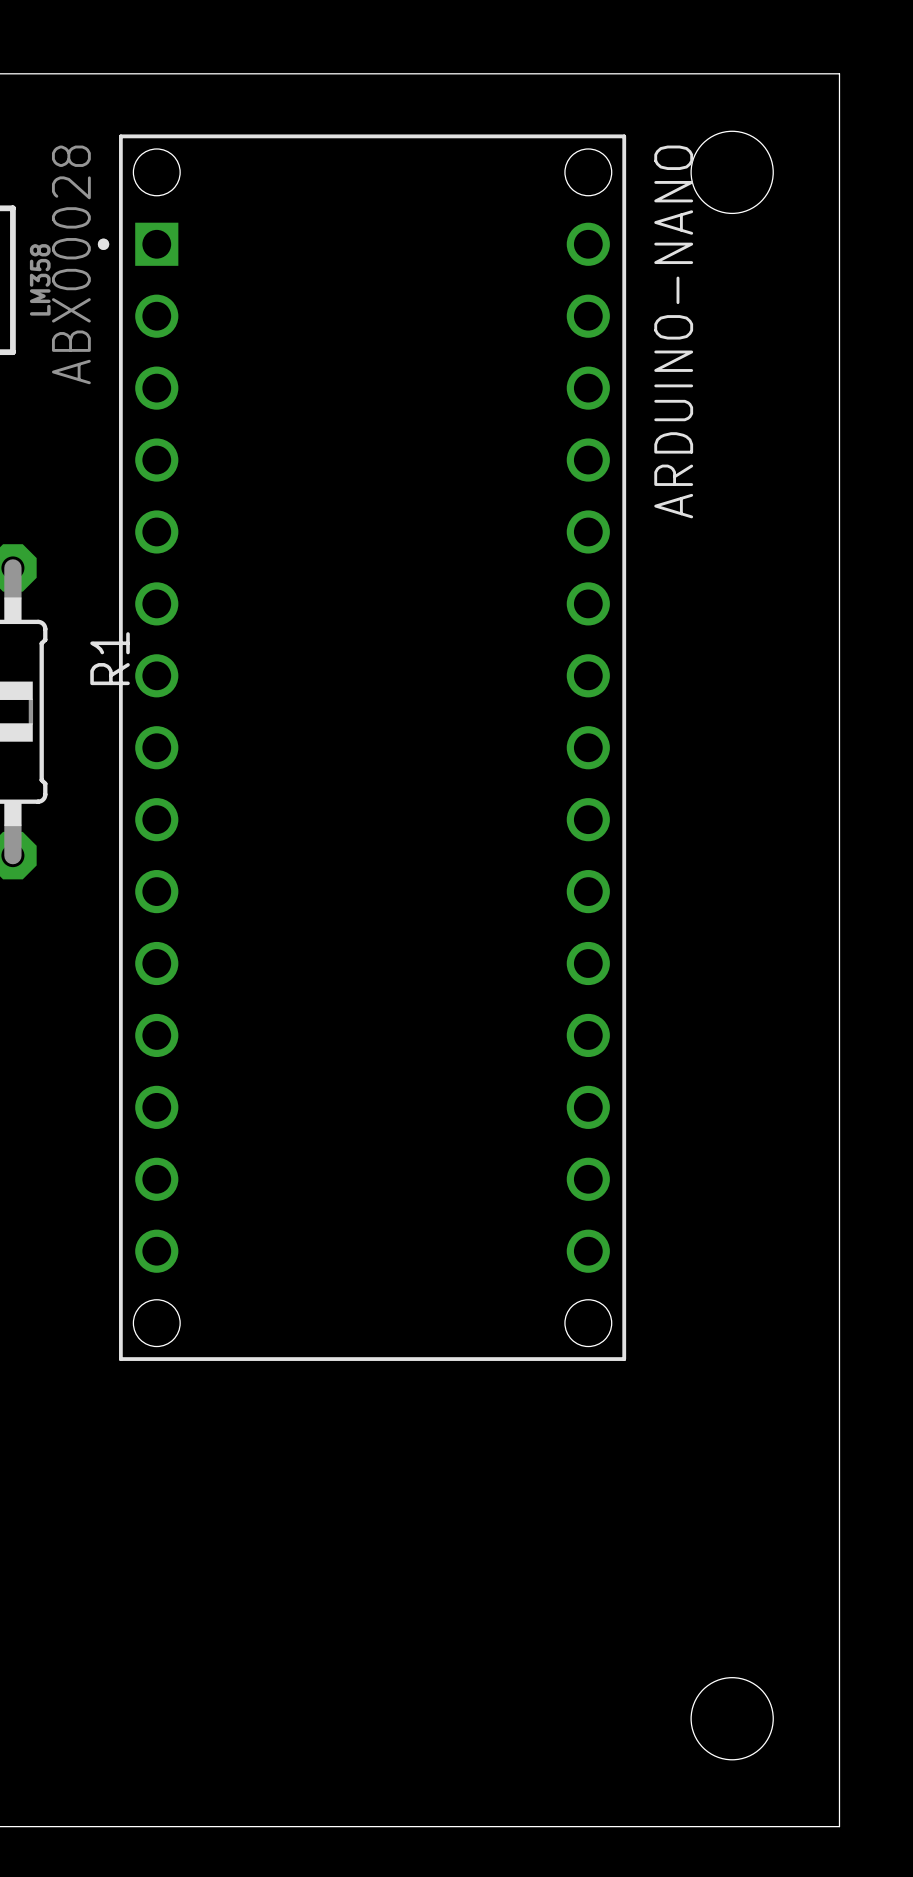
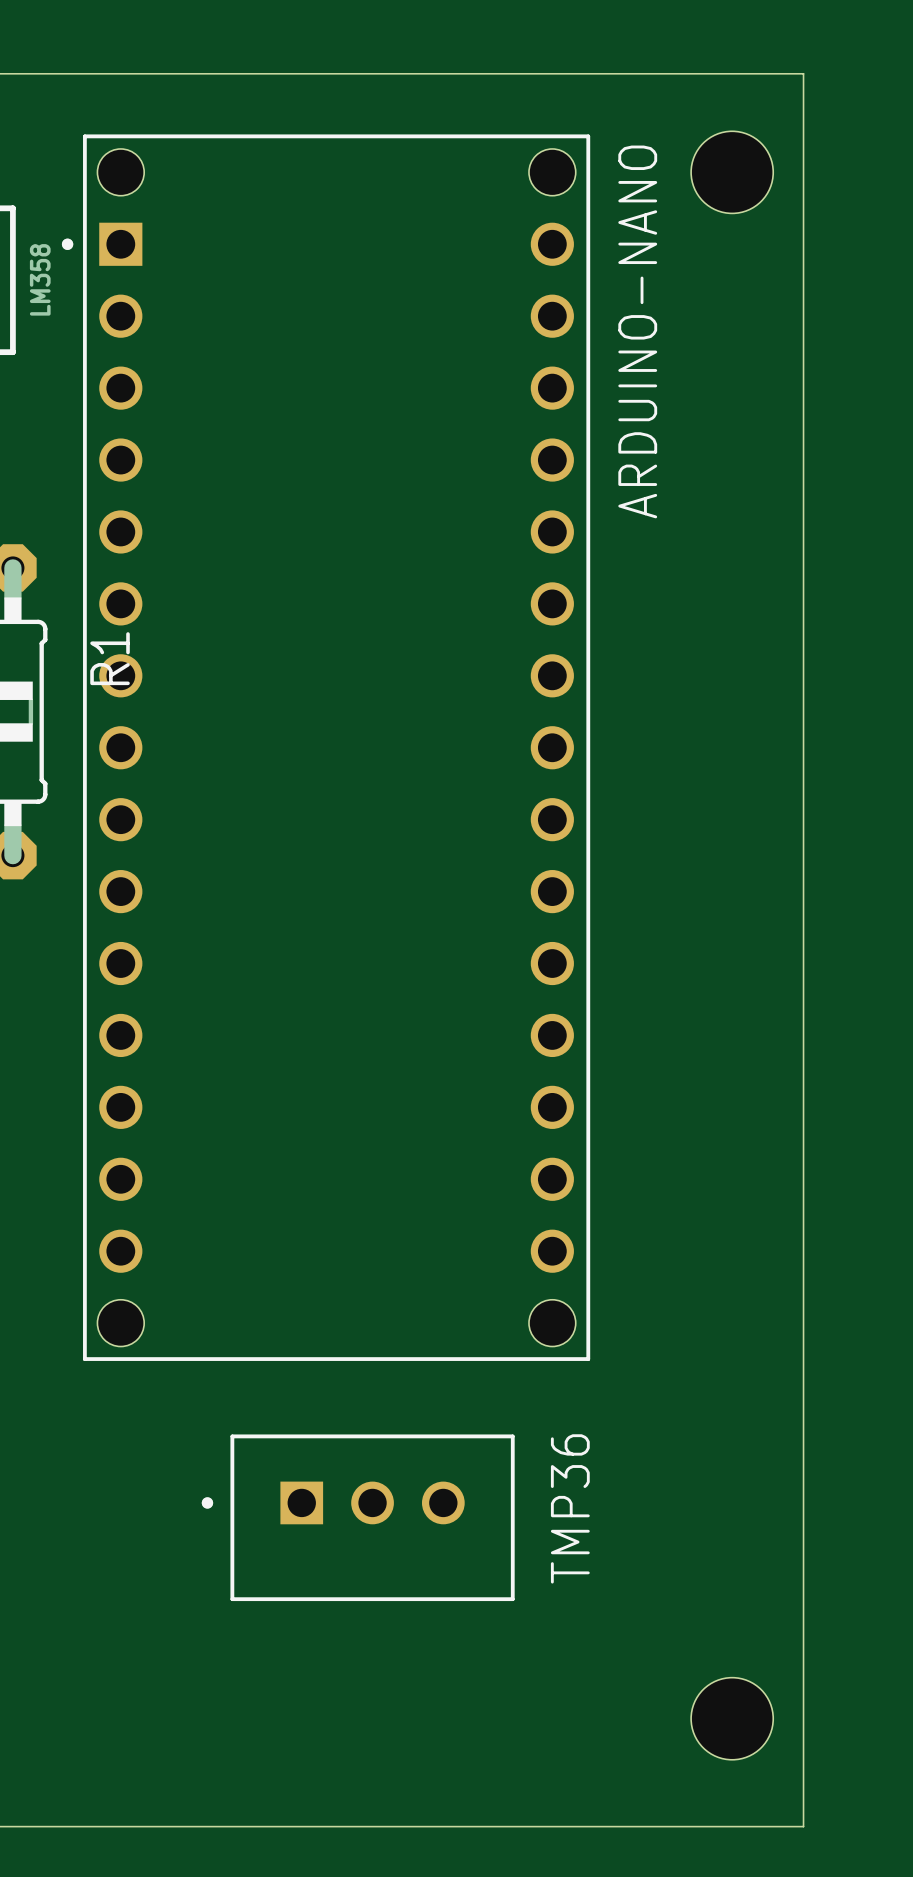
board edge: (803, 73) (839, 73) (839, 1826) (803, 1826) -> (803, 73) (803, 1826)
ARDUINO-NANO: none -> (326, 747)
ARDUINO-NANO: ABX00028 (361, 747) -> none
TMP36: none -> (358, 1517)

